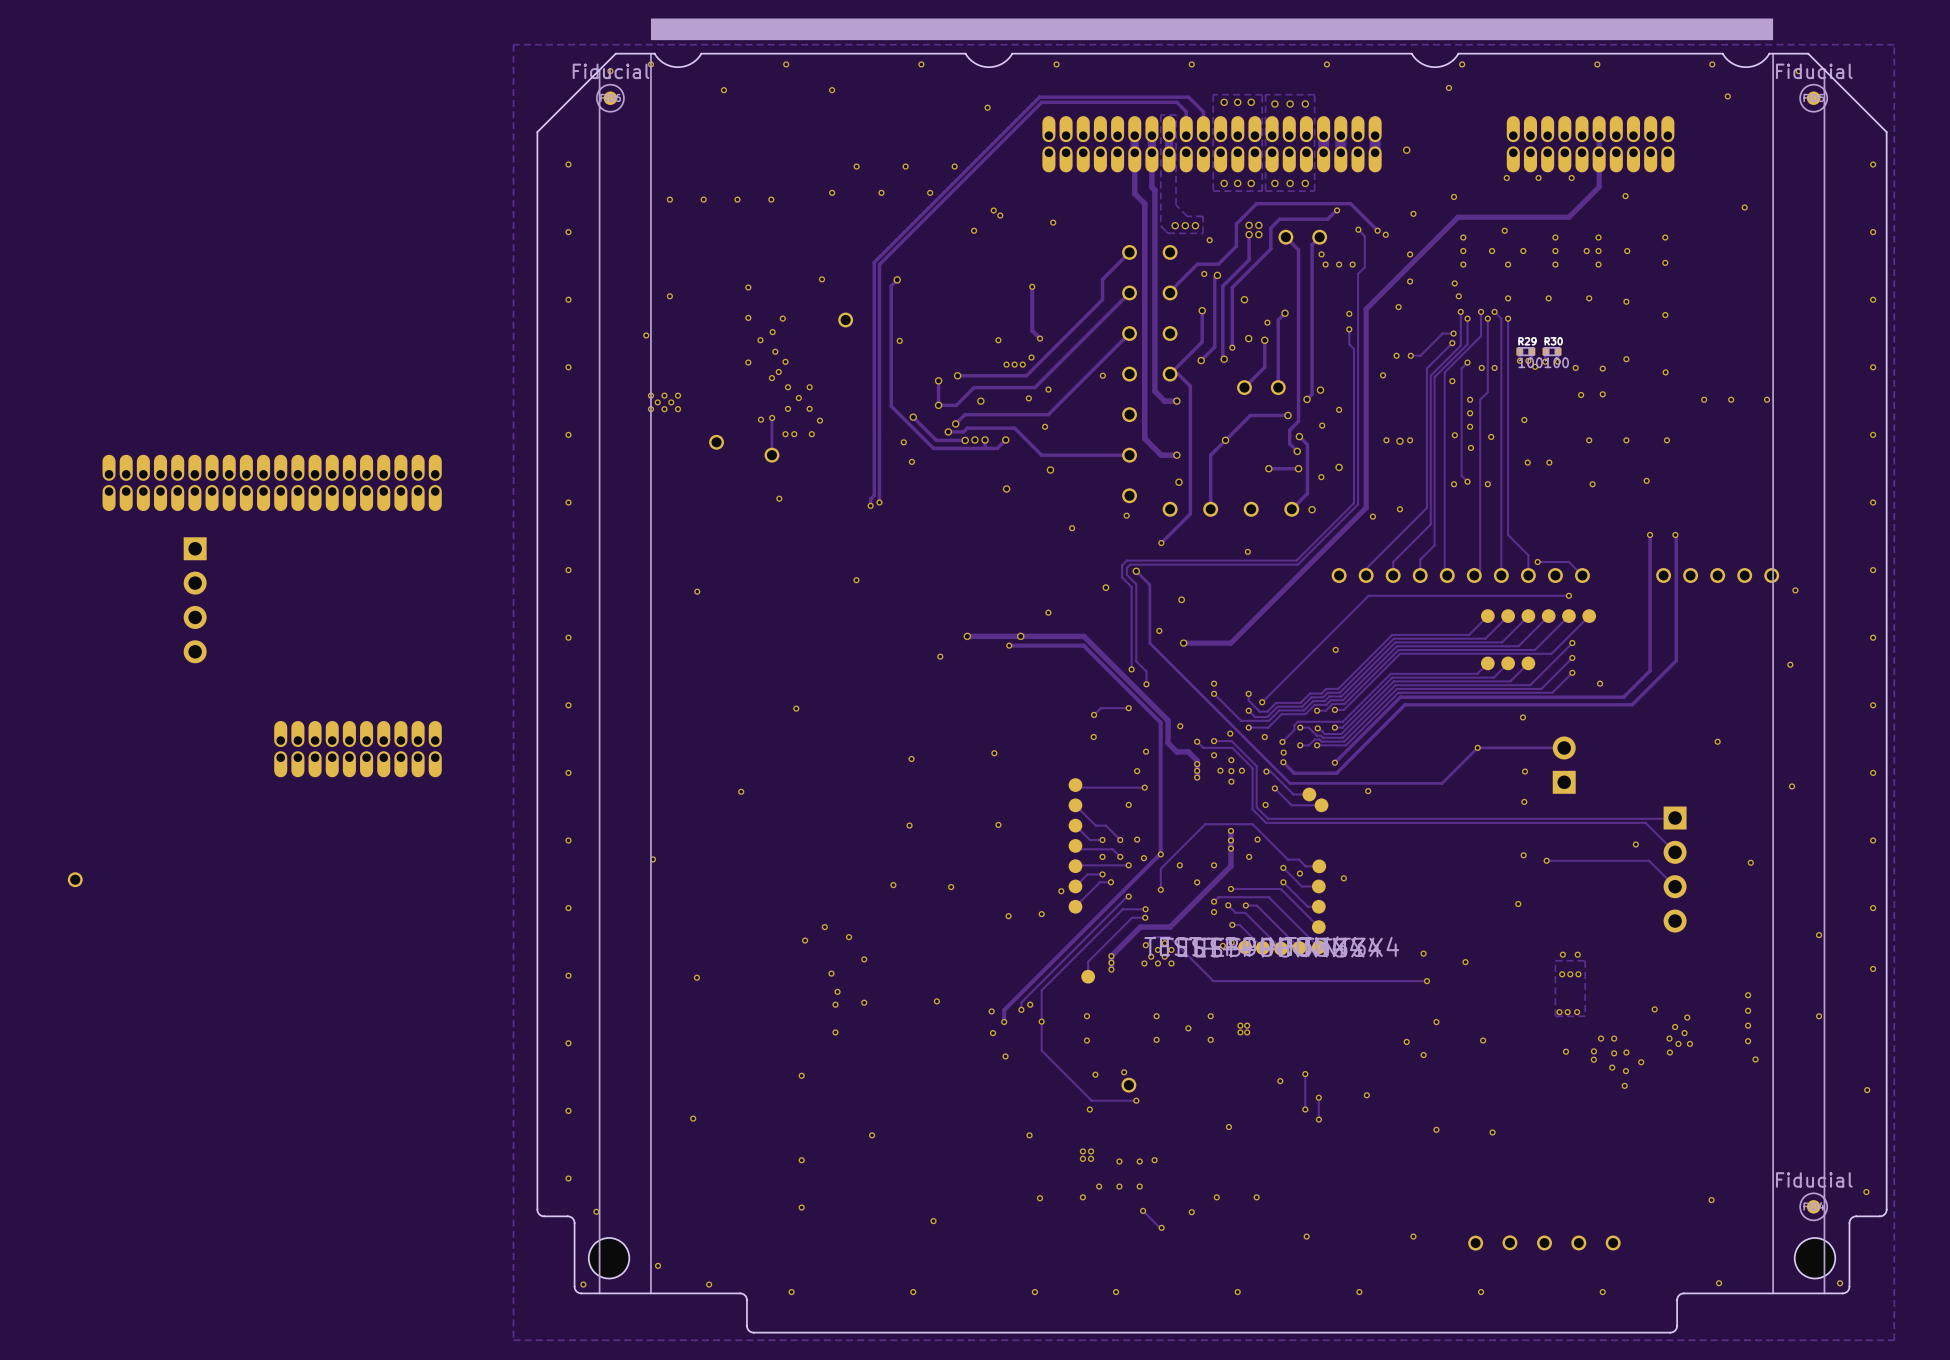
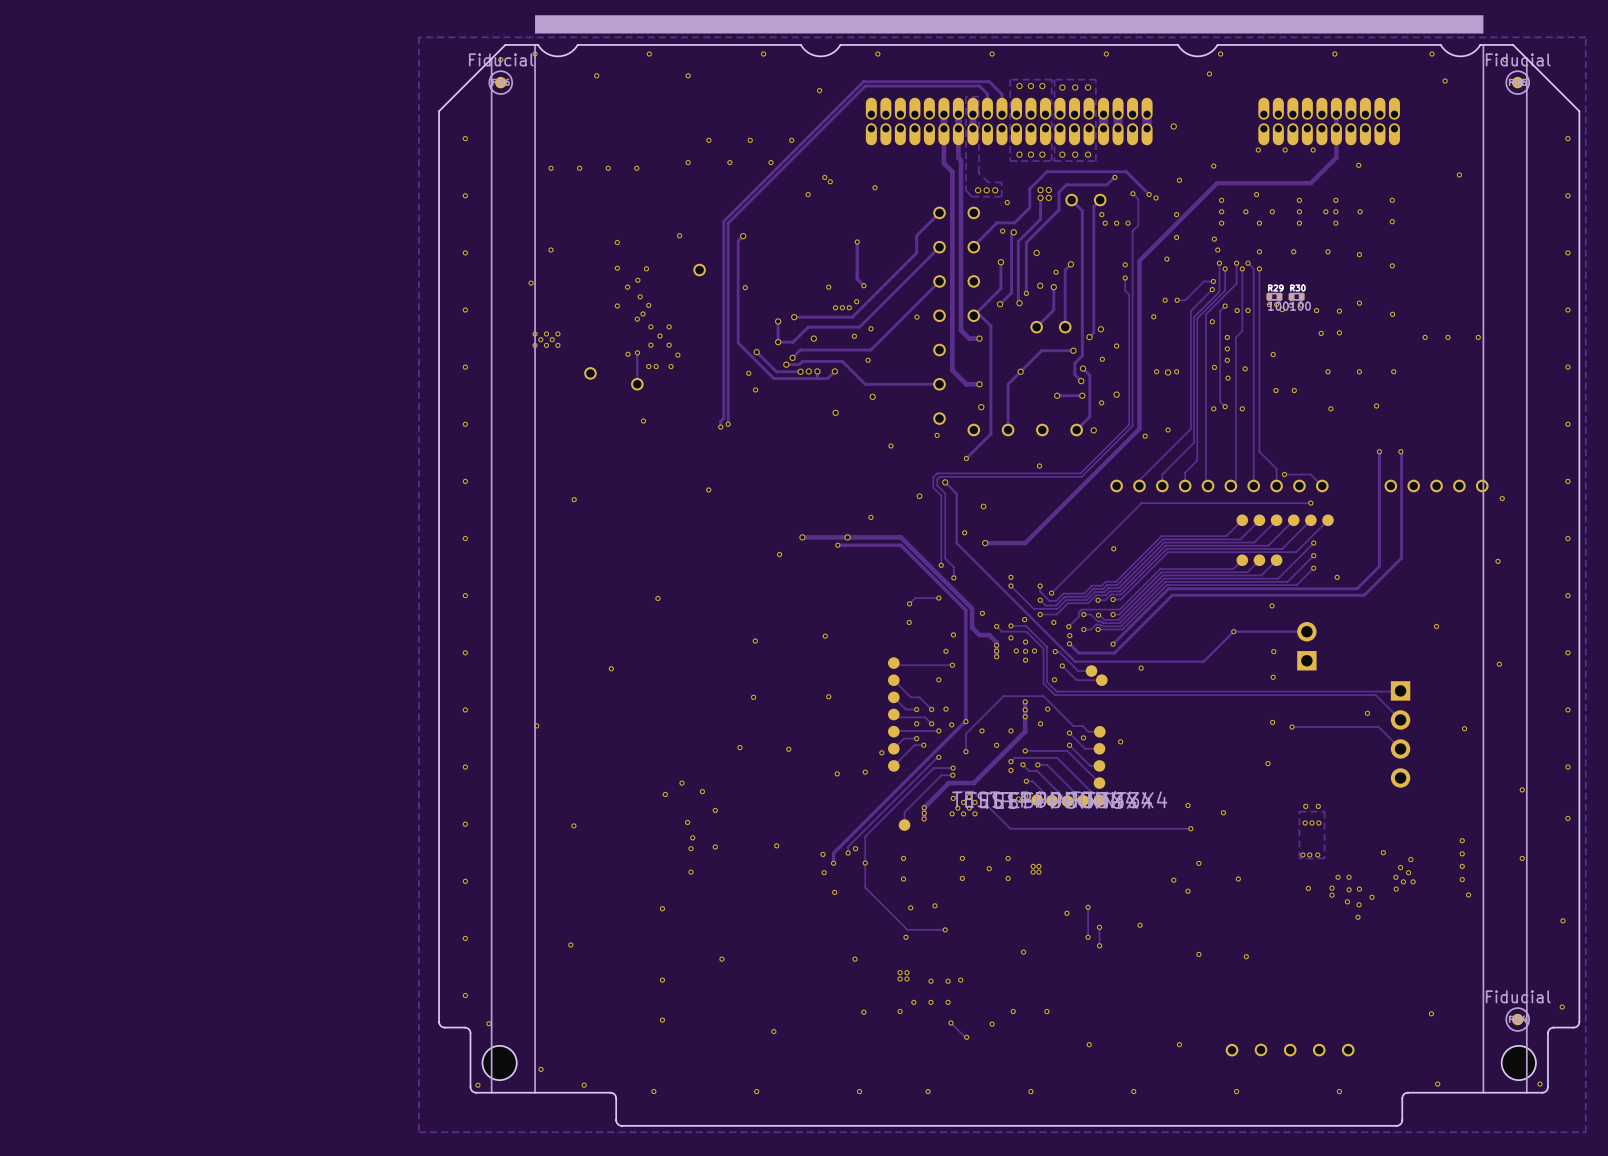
part: (272, 482) -> none
part: (195, 600) -> none
part: (357, 749) -> none
part: (75, 879) -> none
part: (1128, 1085) -> none

